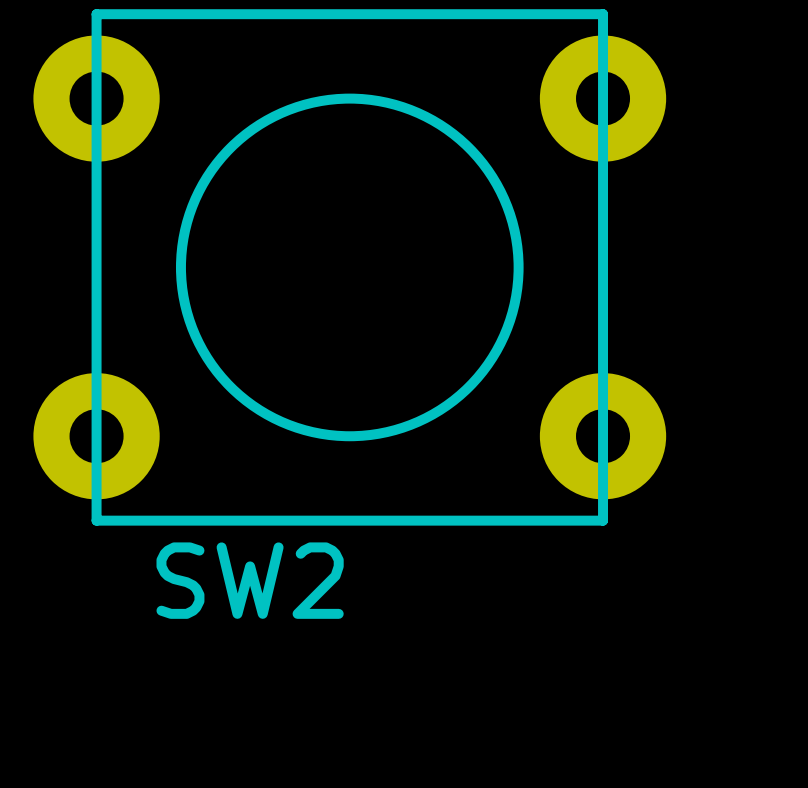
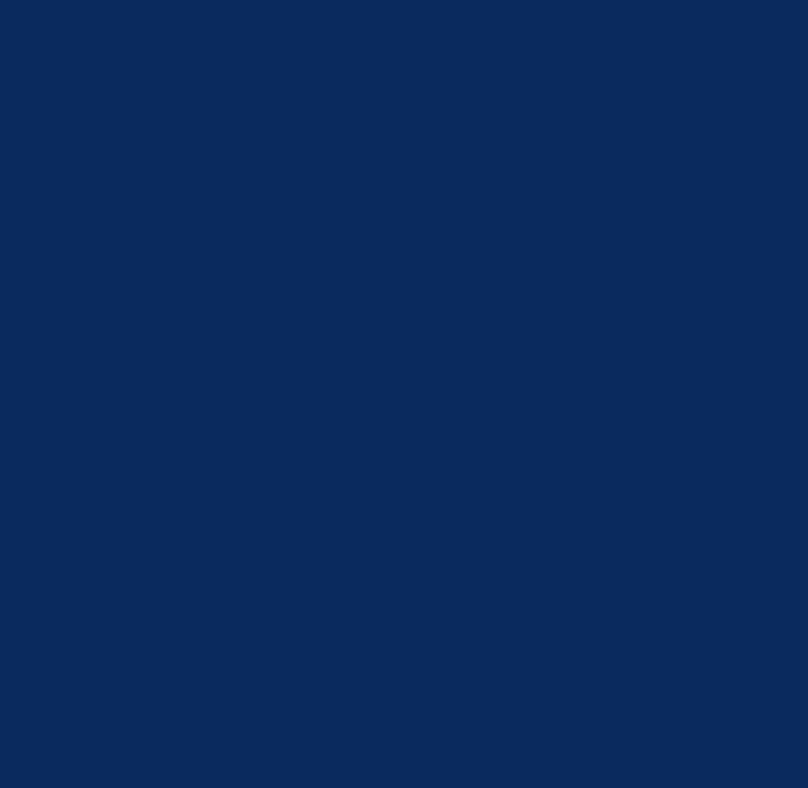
SW2: (349, 267) -> none

